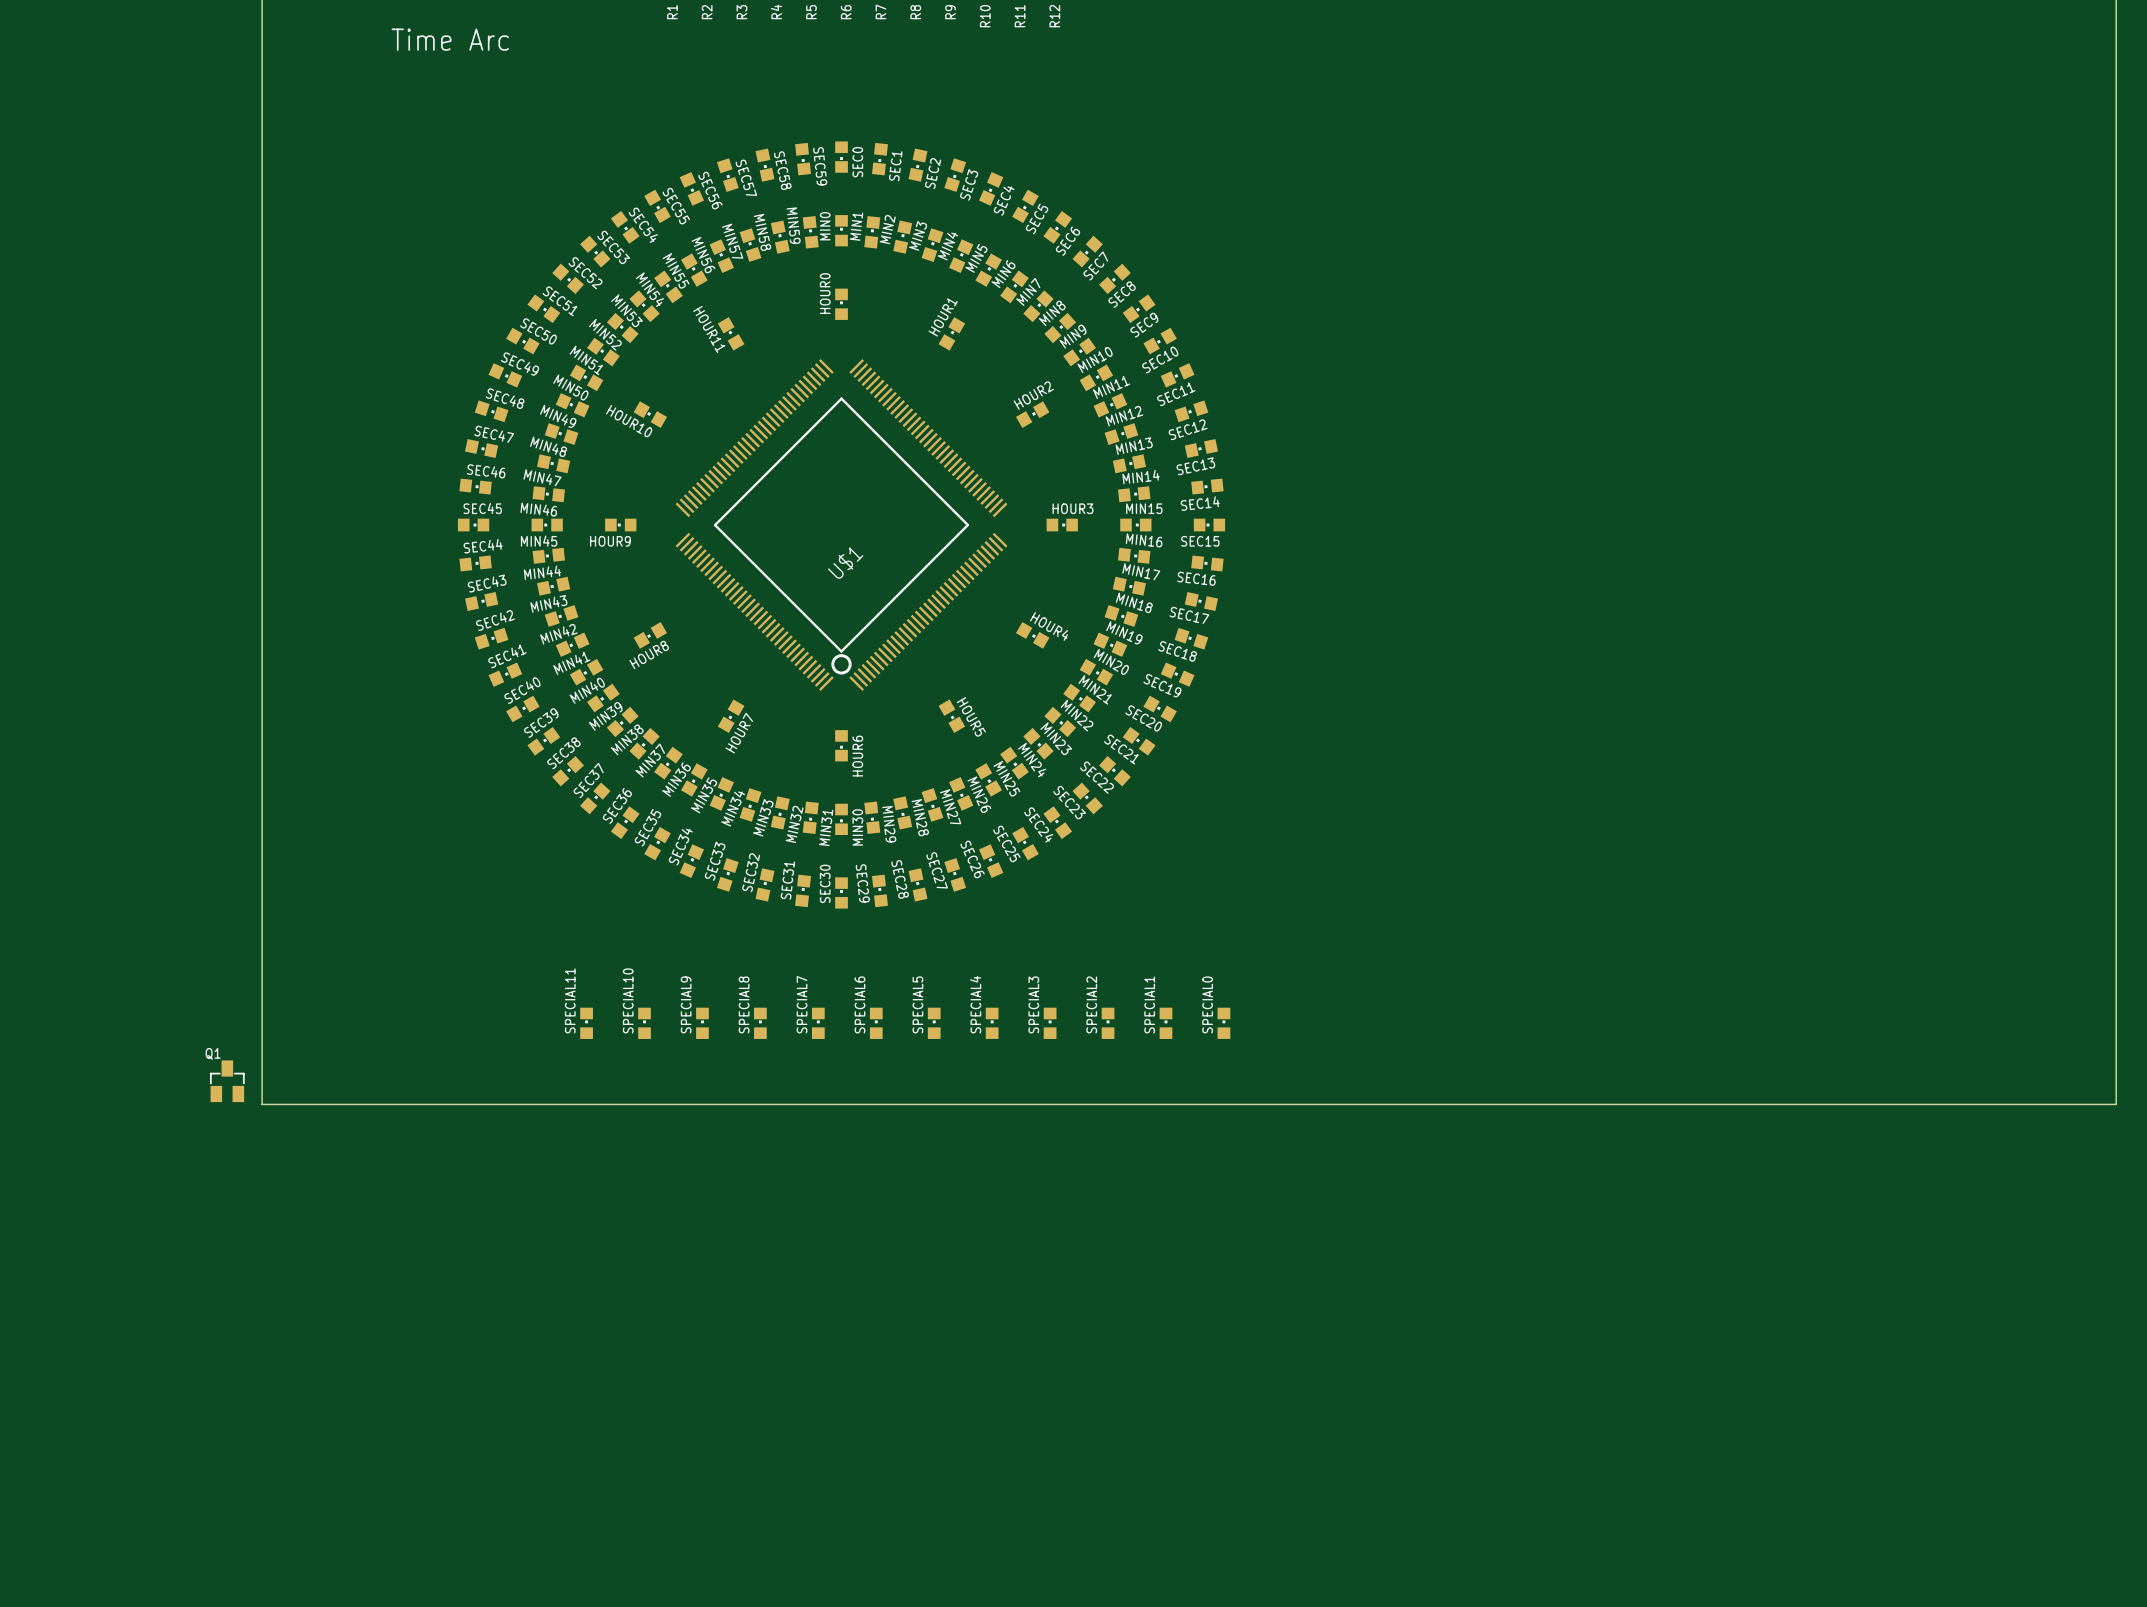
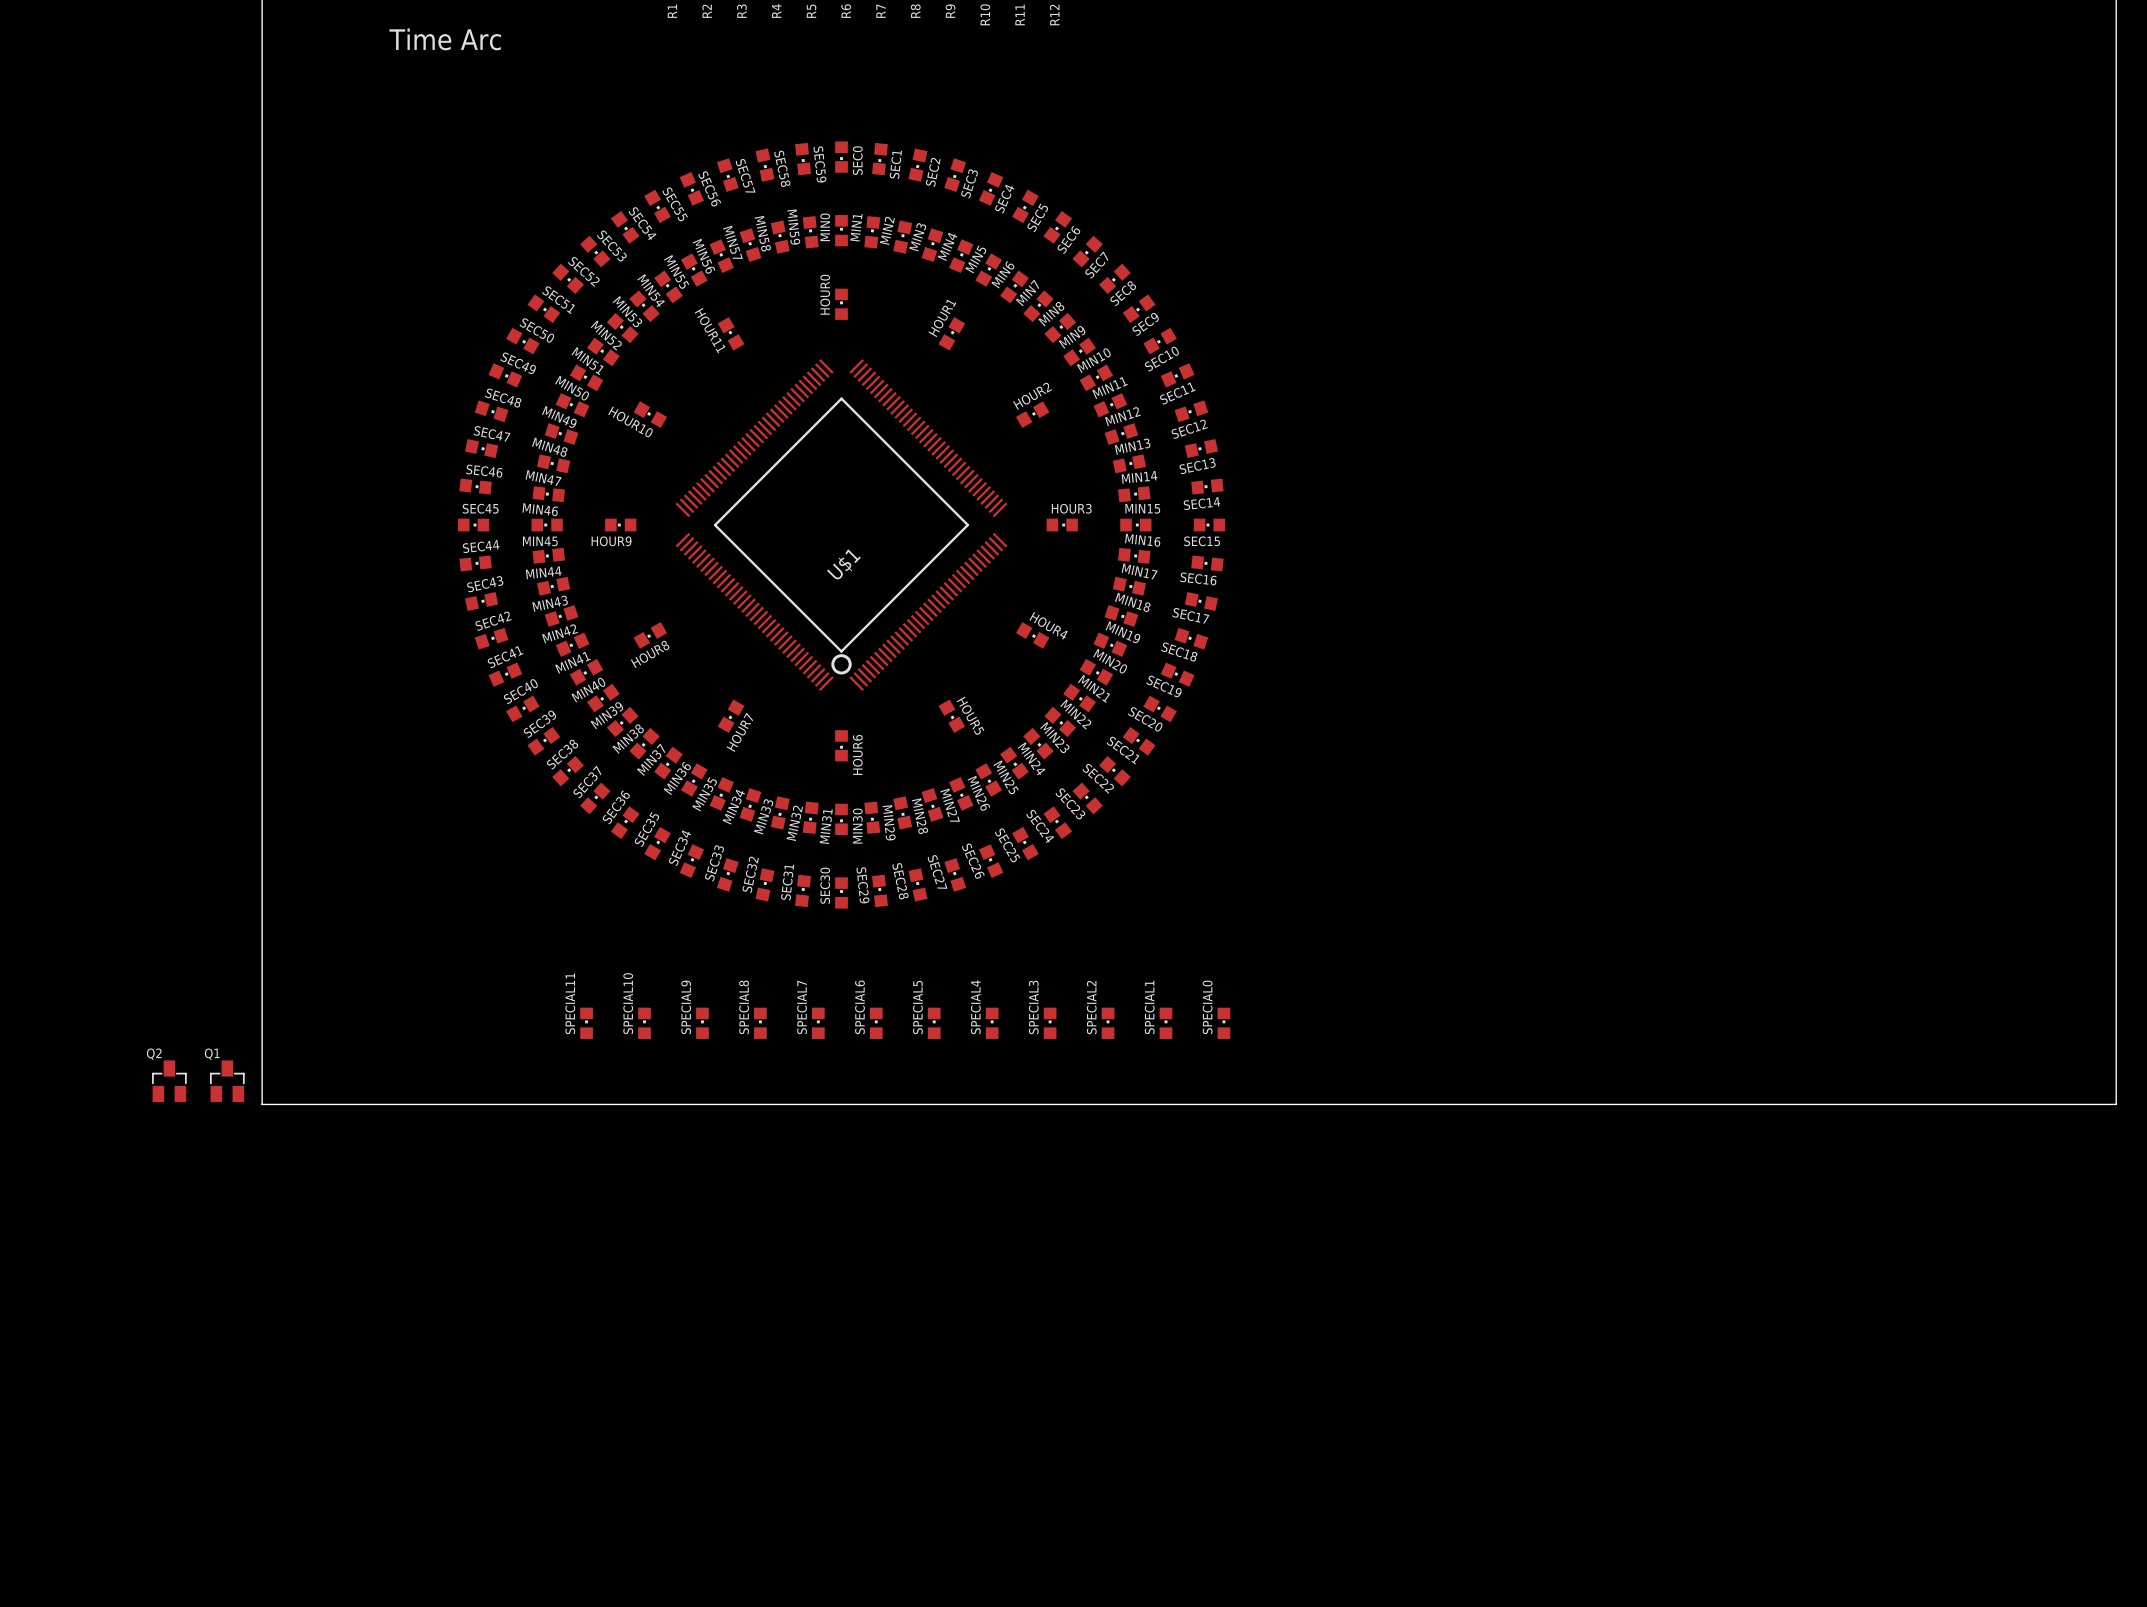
Q2: none -> (169, 1081)

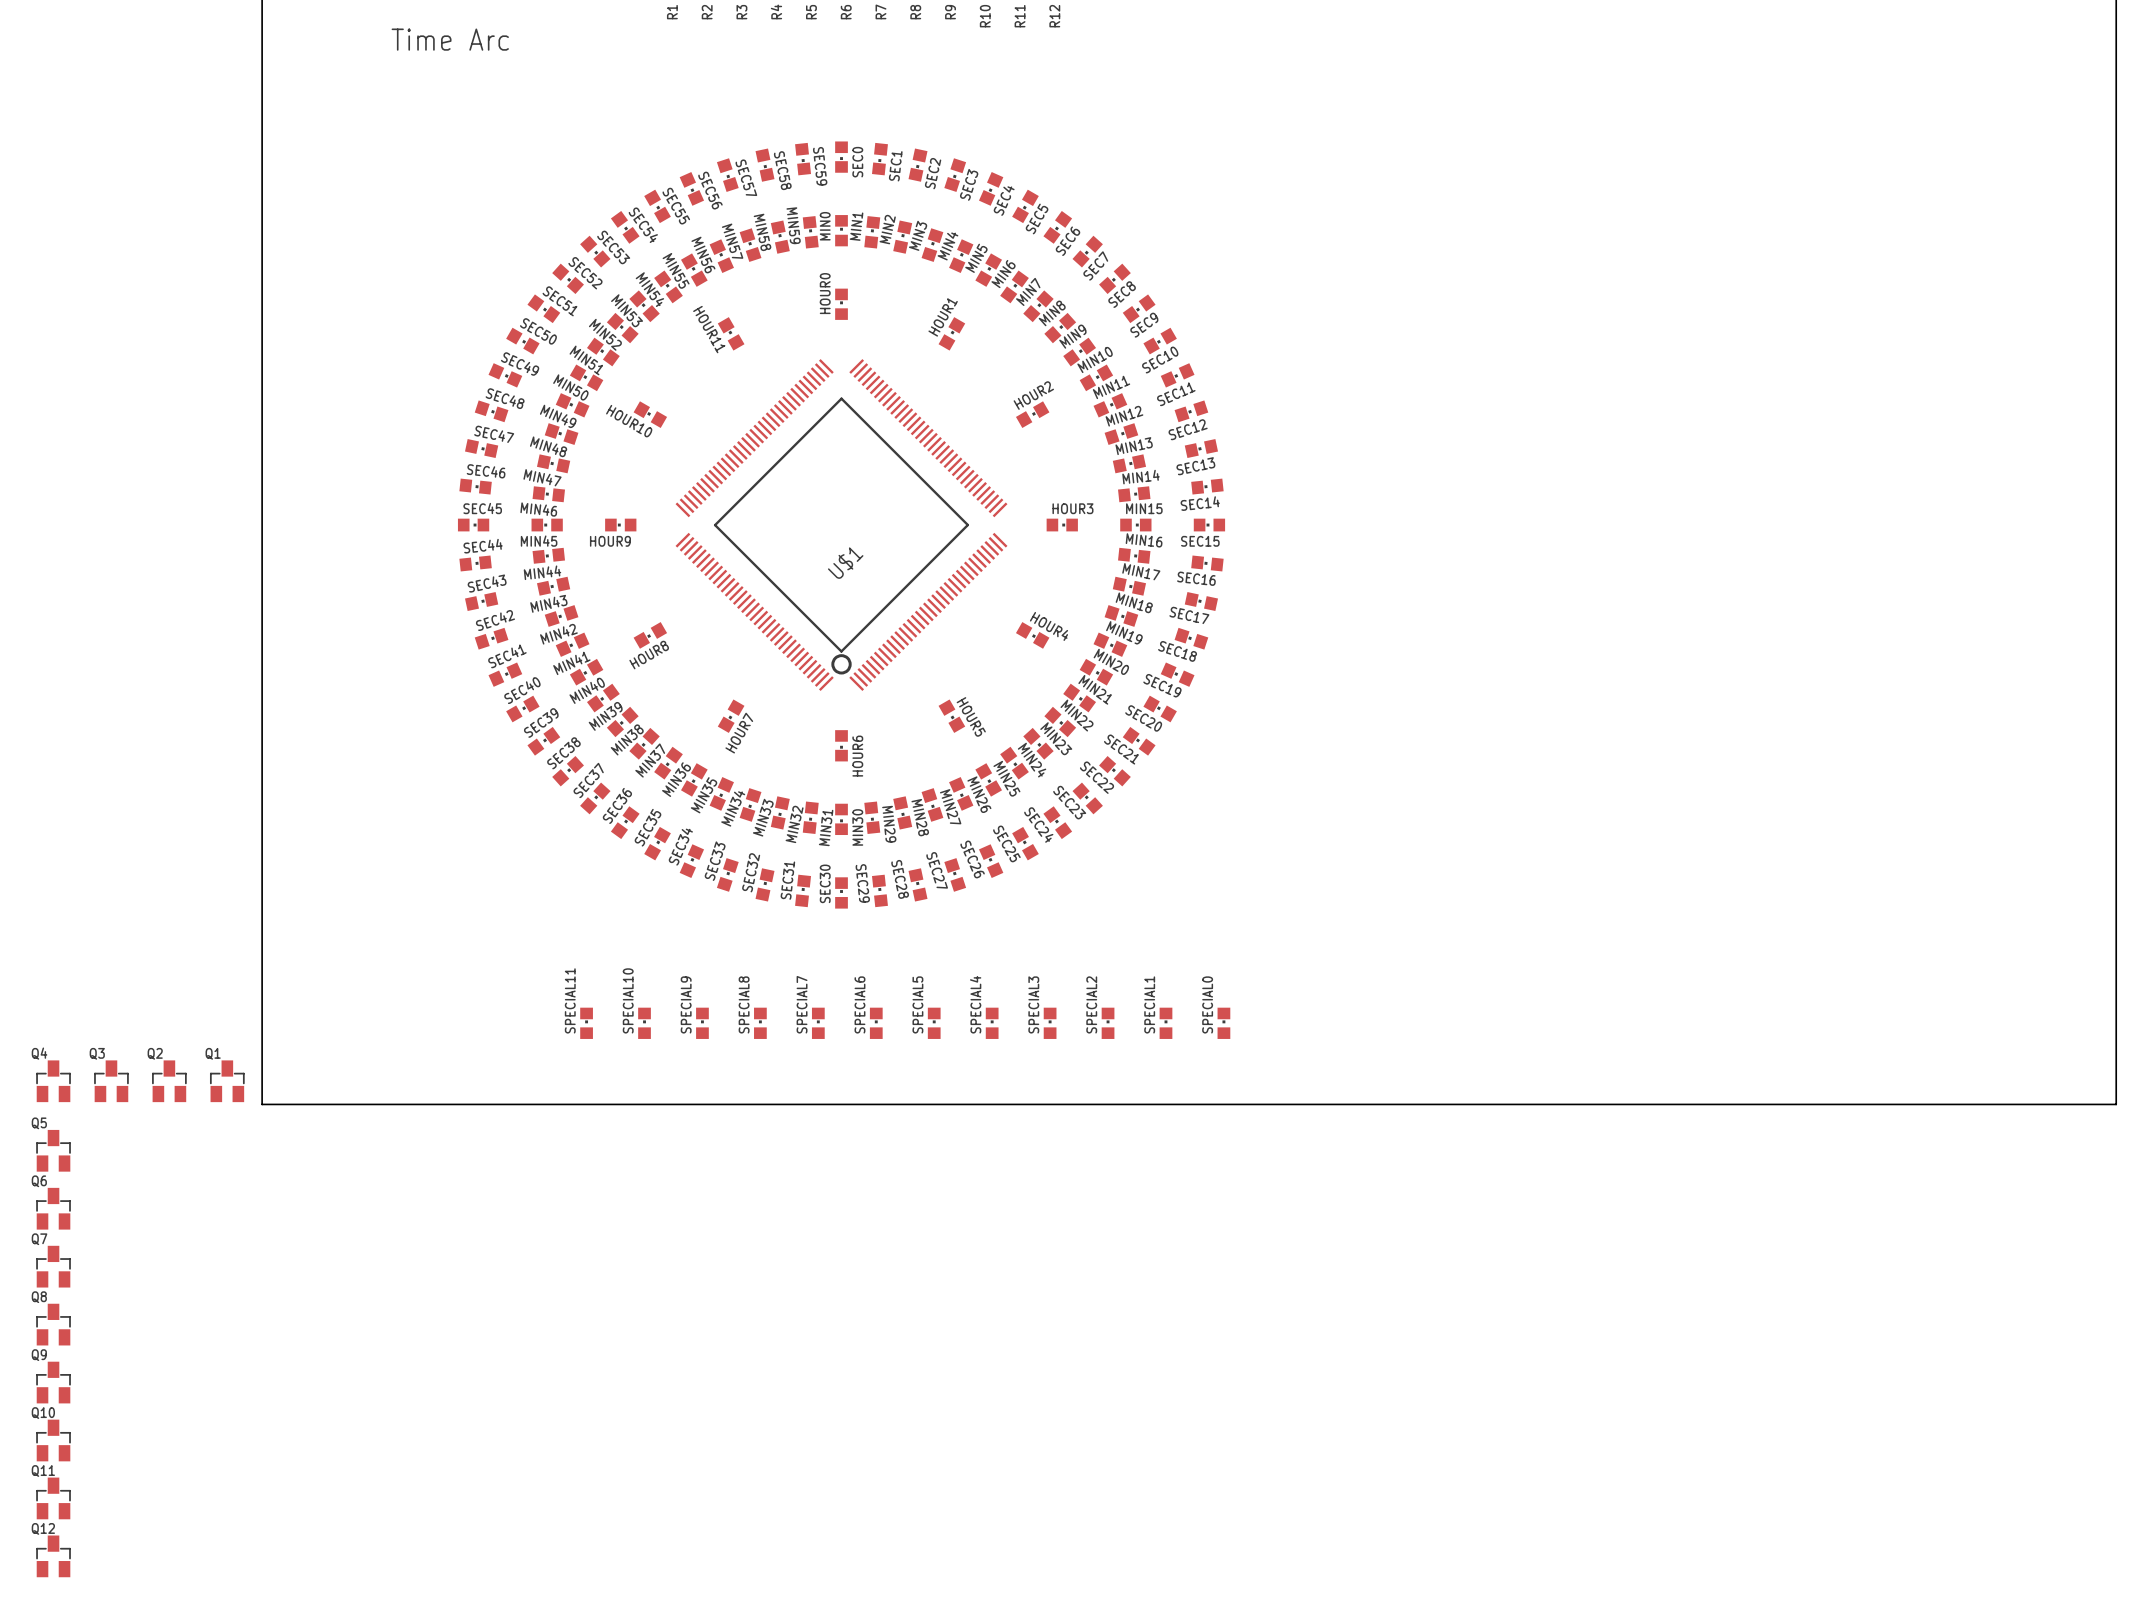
Q4: none -> (53, 1081)
Q3: none -> (111, 1081)
Q5: none -> (53, 1150)
Q6: none -> (53, 1208)
Q7: none -> (53, 1266)
Q8: none -> (53, 1324)
Q9: none -> (53, 1382)
Q10: none -> (53, 1440)
Q11: none -> (53, 1498)
Q12: none -> (53, 1556)

